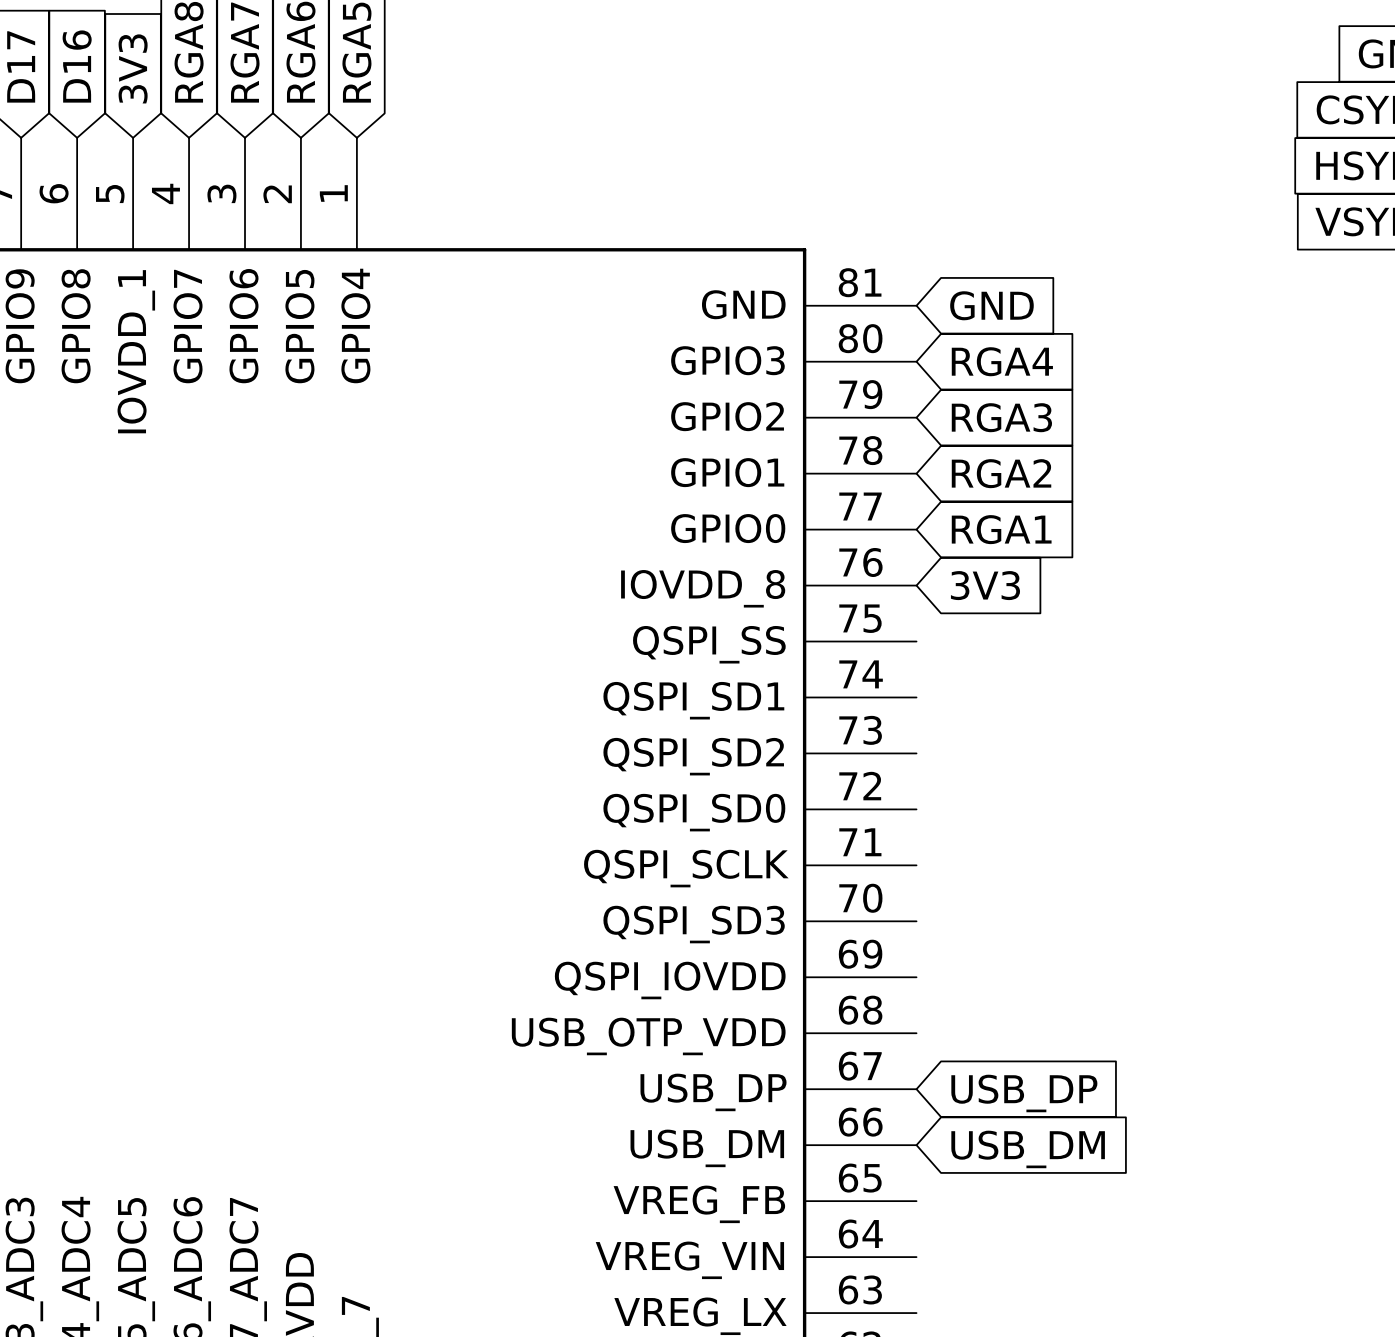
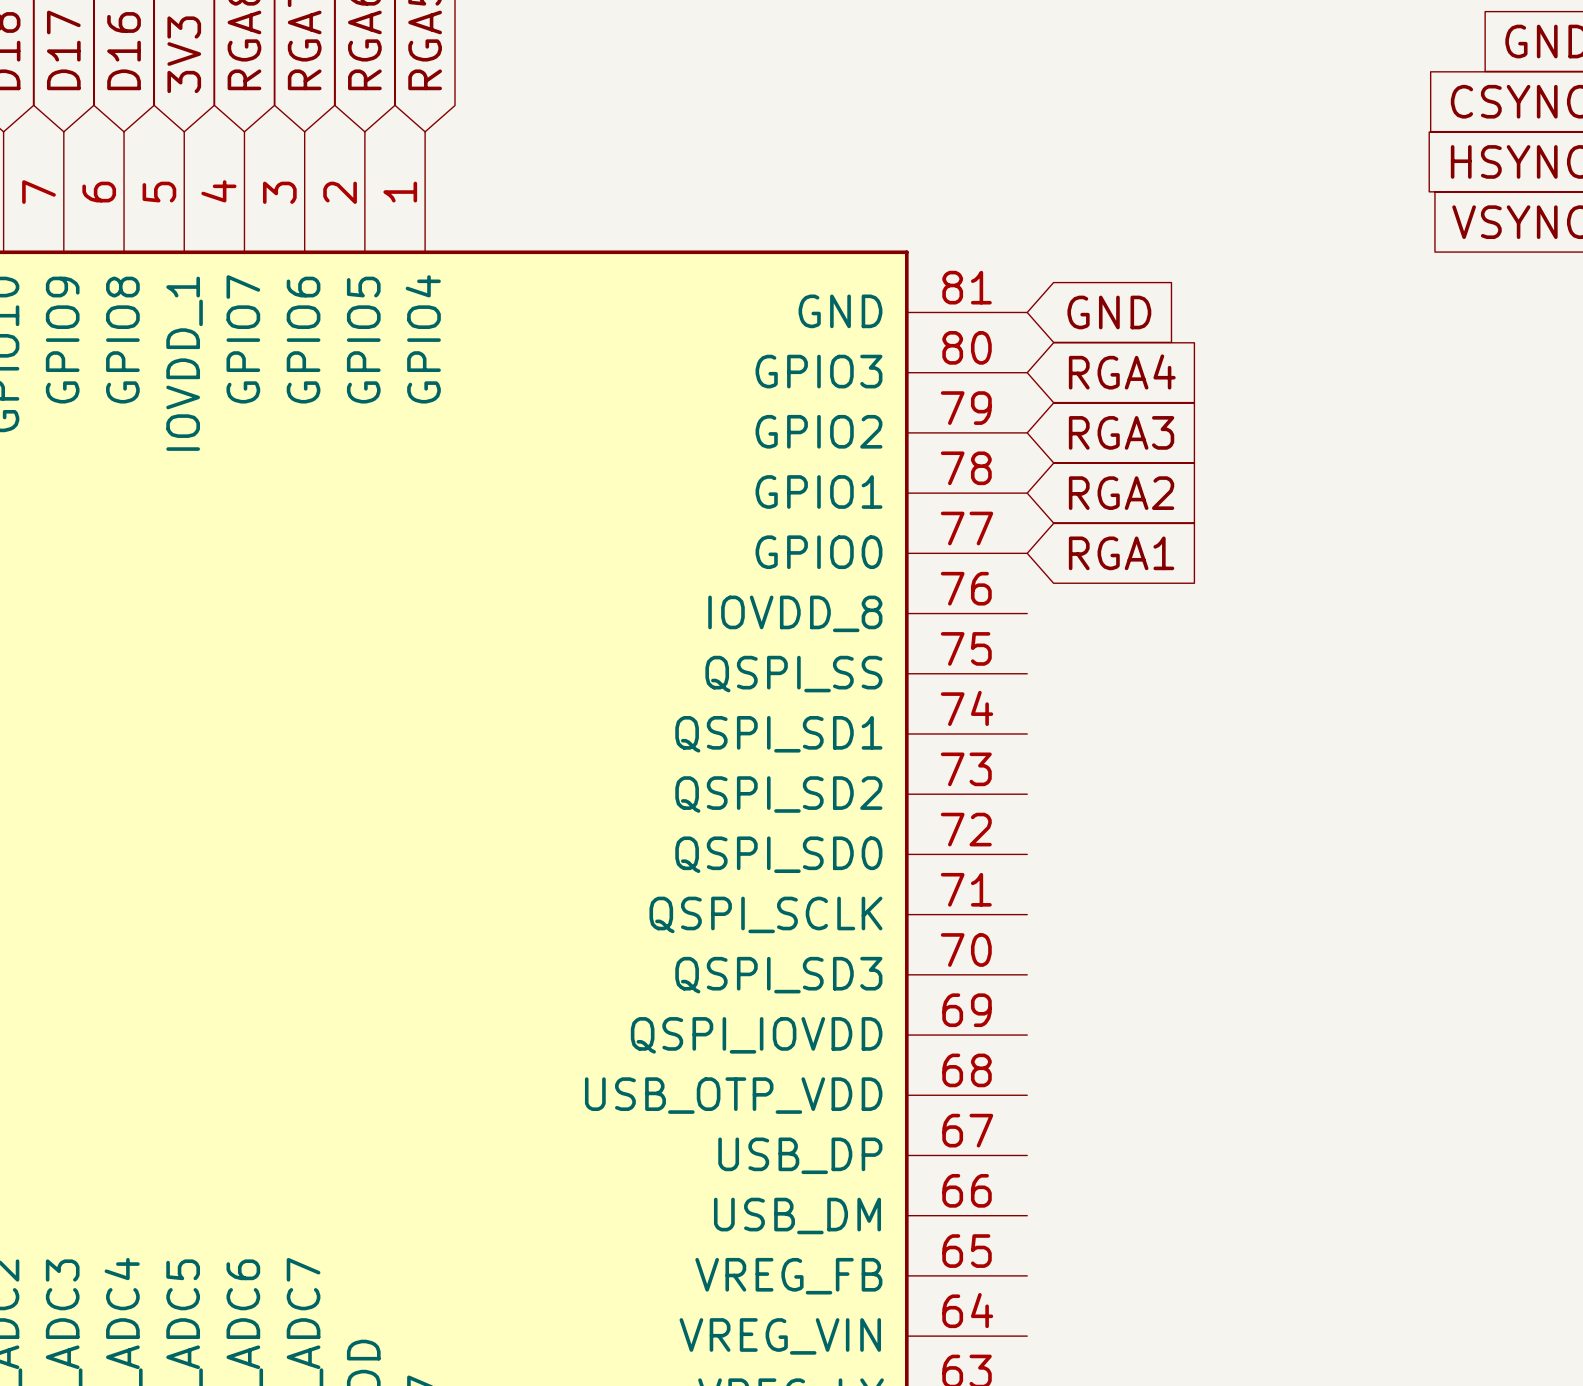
global label: 3V3 (985, 585) -> none
global label: USB_DP (1024, 1093) -> none
global label: USB_DM (1028, 1149) -> none

